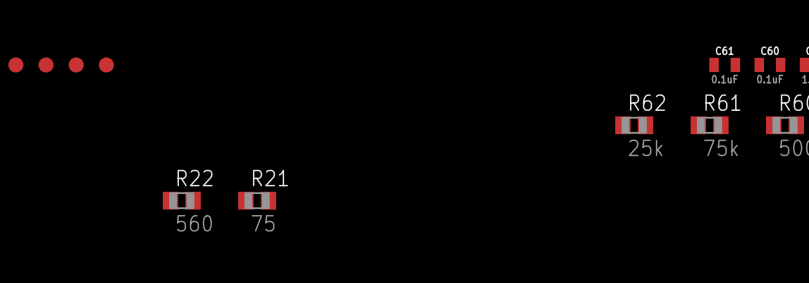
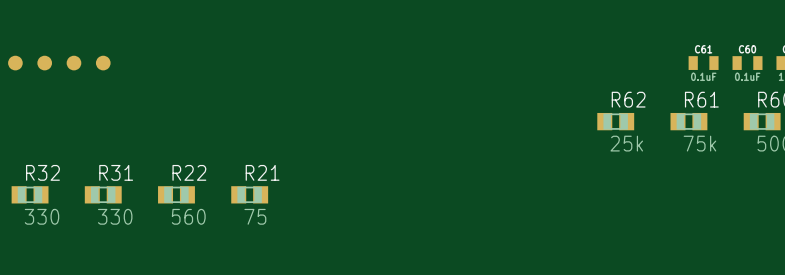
R32: none -> 330 (30, 194)
R31: none -> 330 (103, 194)

